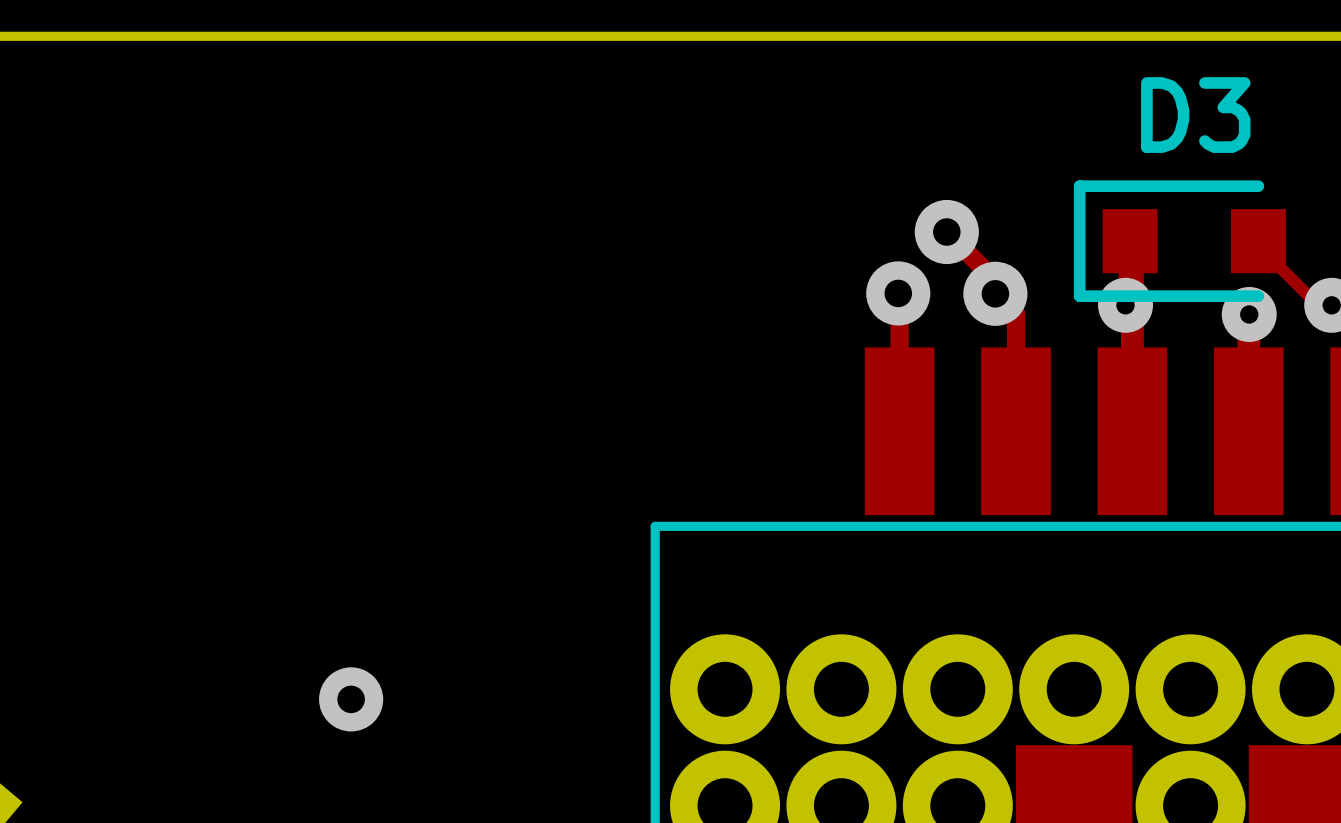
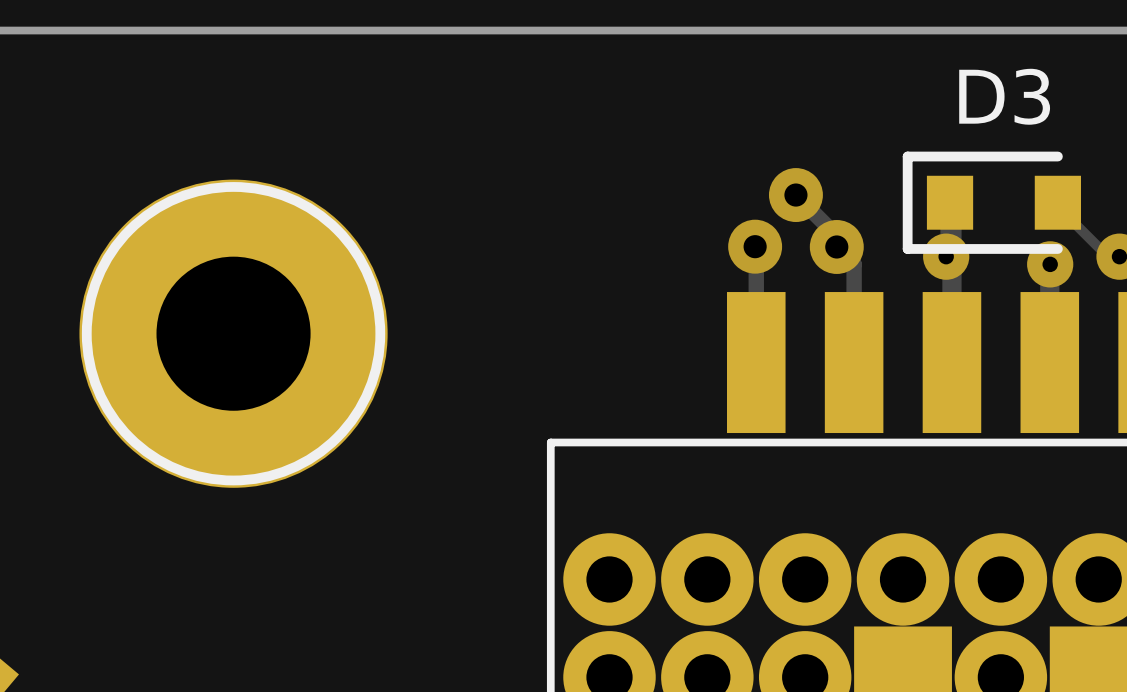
part: none -> (233, 333)
via: (351, 699) -> none

